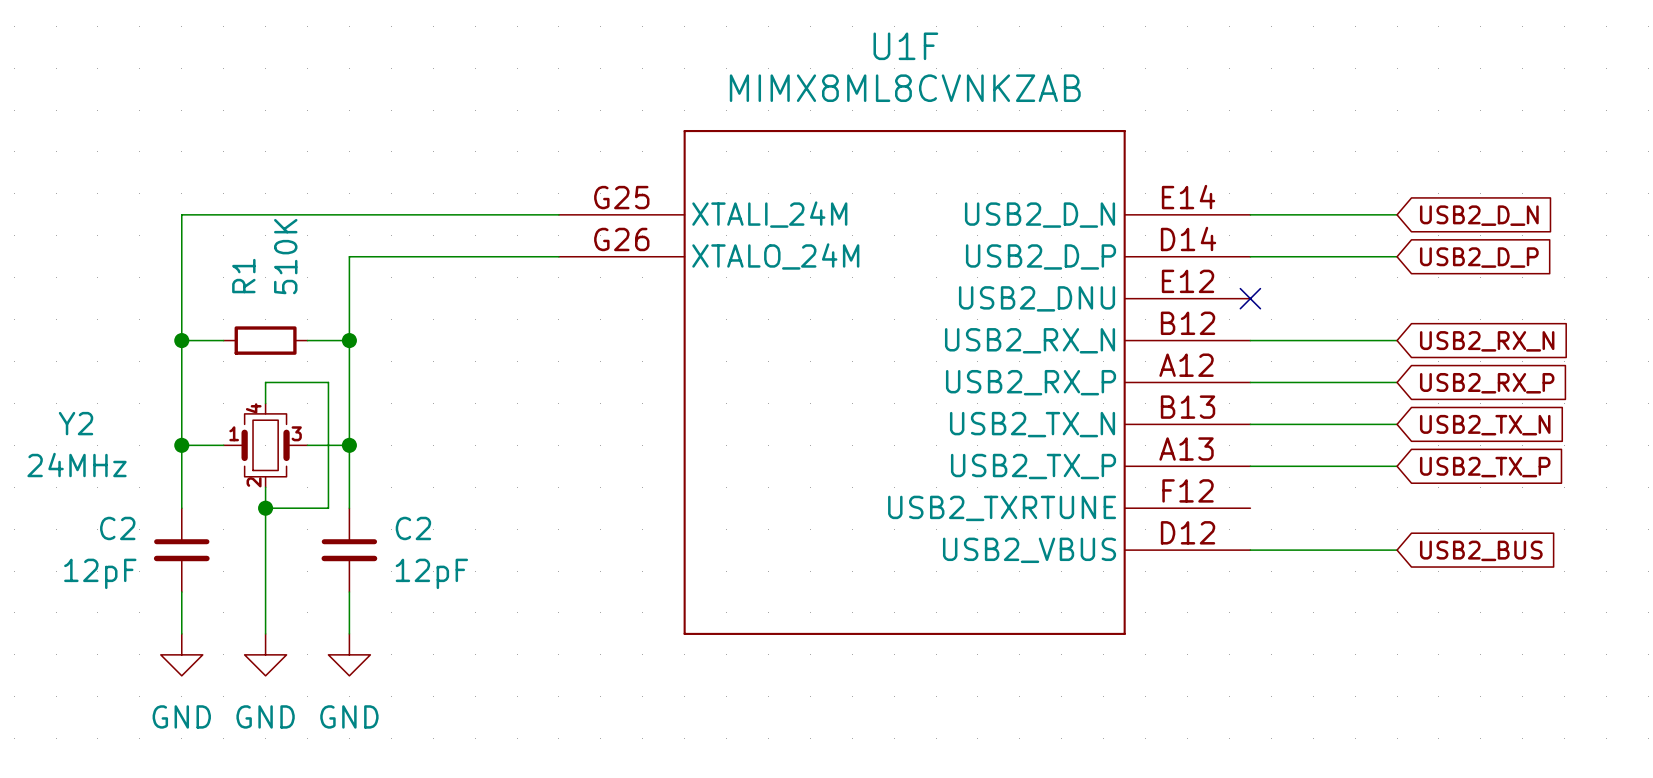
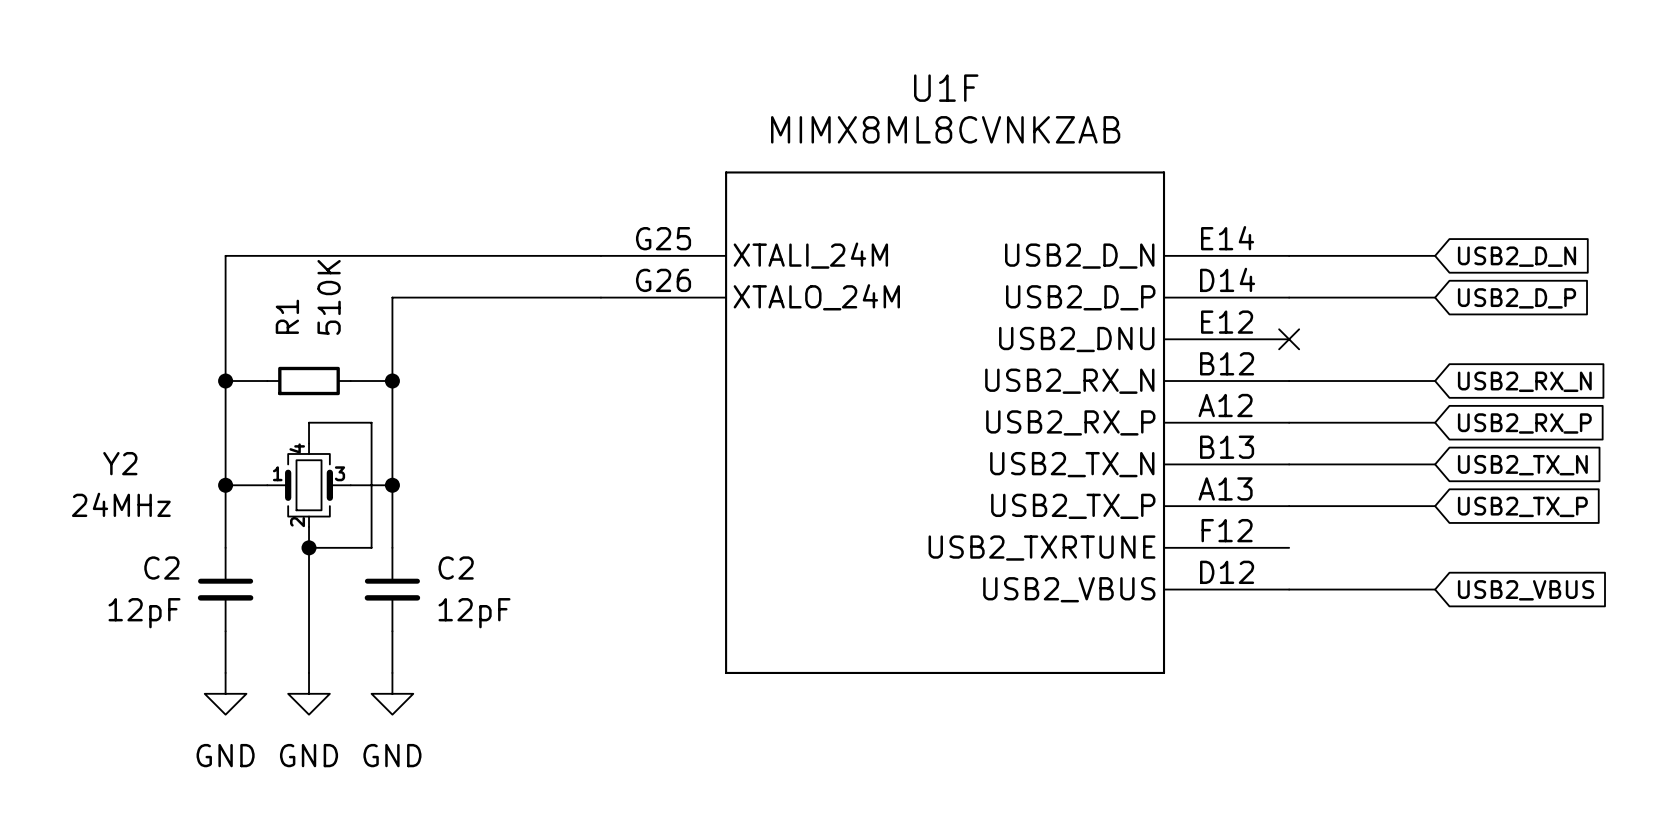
global label: USB2_BUS (1481, 550) -> USB2_VBUS (1525, 590)

